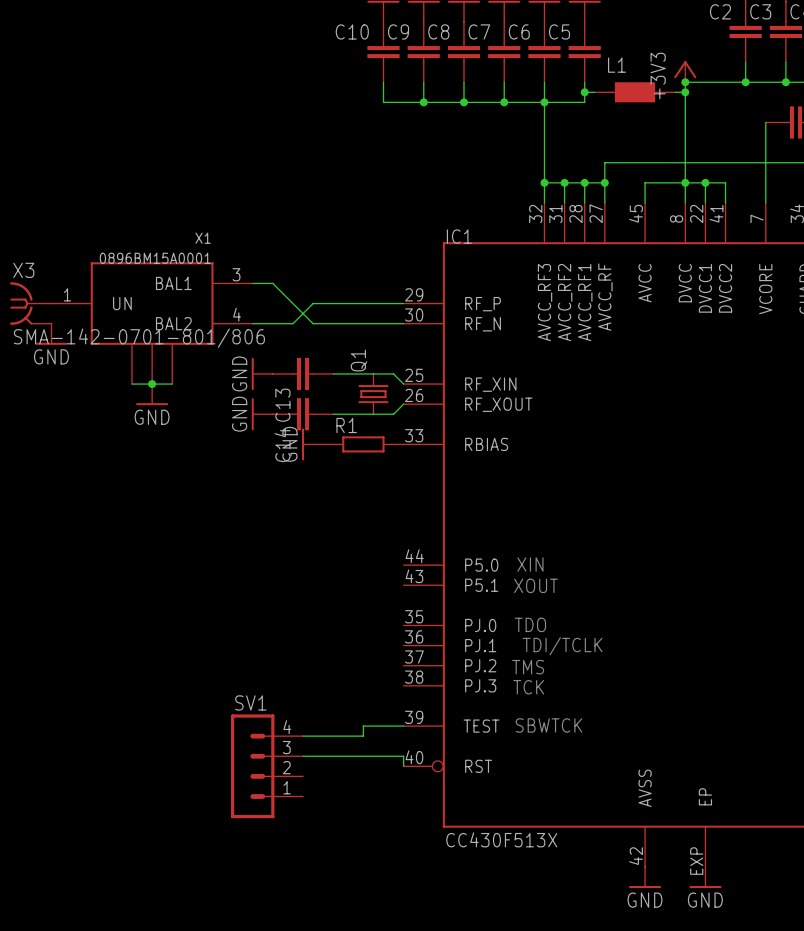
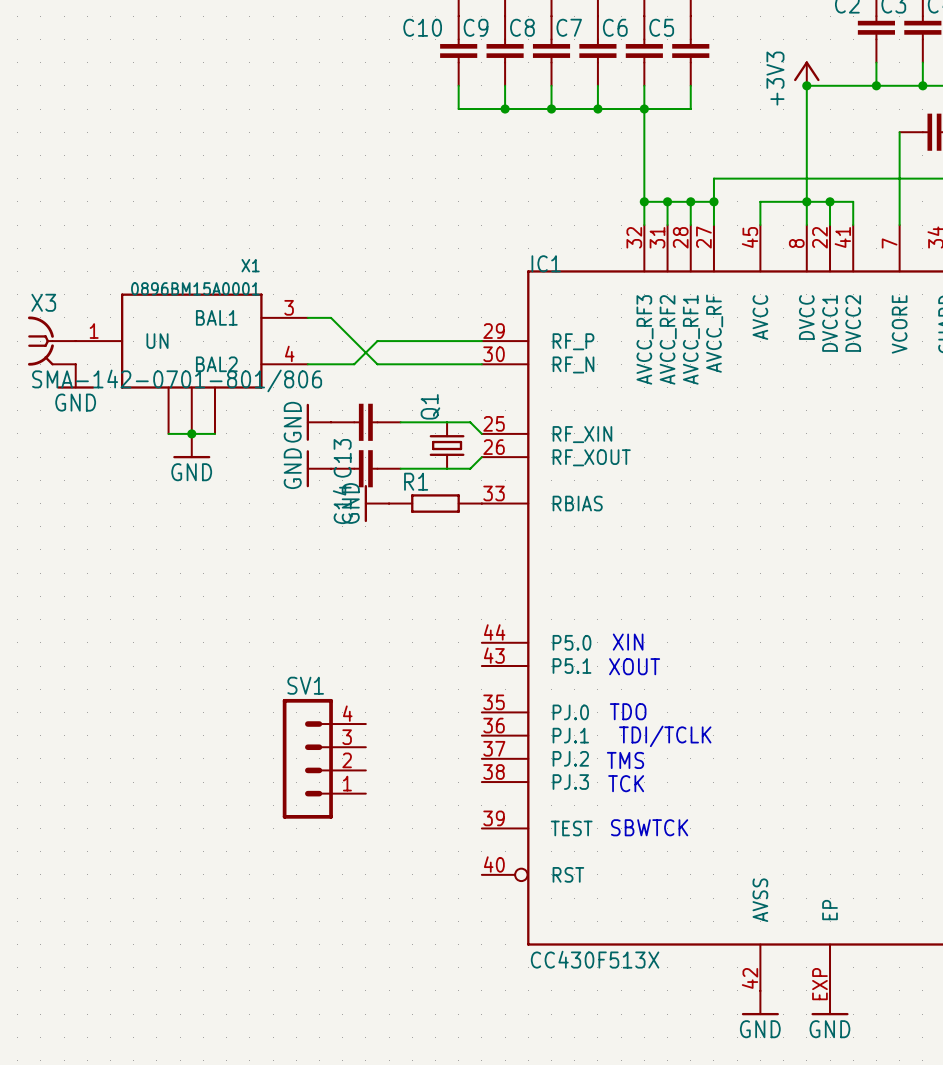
wire: (584, 92) (594, 92) -> none
junction: (584, 92) -> none
L1: (635, 92) -> none
wire: (675, 92) (685, 92) -> none
junction: (685, 92) -> none
wire: (403, 726) (363, 726) (363, 736) (303, 736) -> none
wire: (303, 756) (403, 756) (403, 766) -> none
SV1 position: (267, 766) -> (324, 758)

